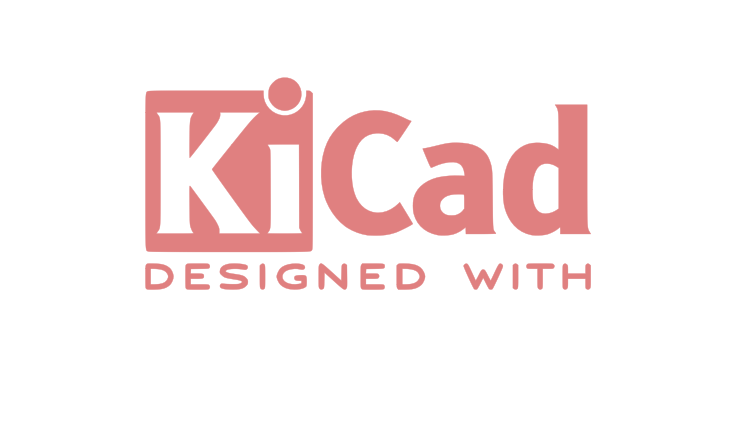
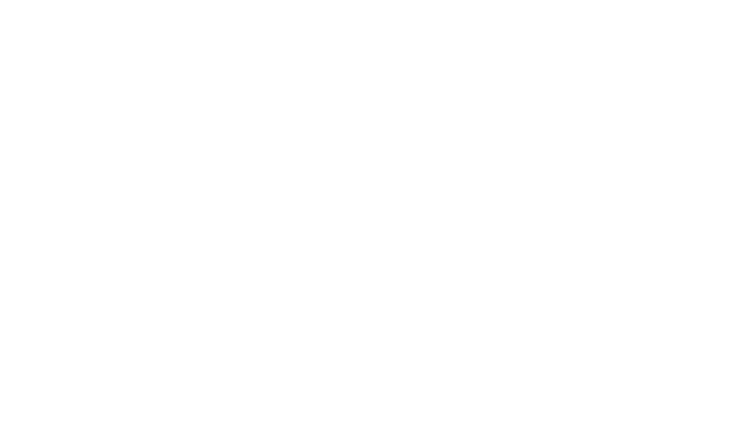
drawing: [145, 77, 591, 290] -> none

